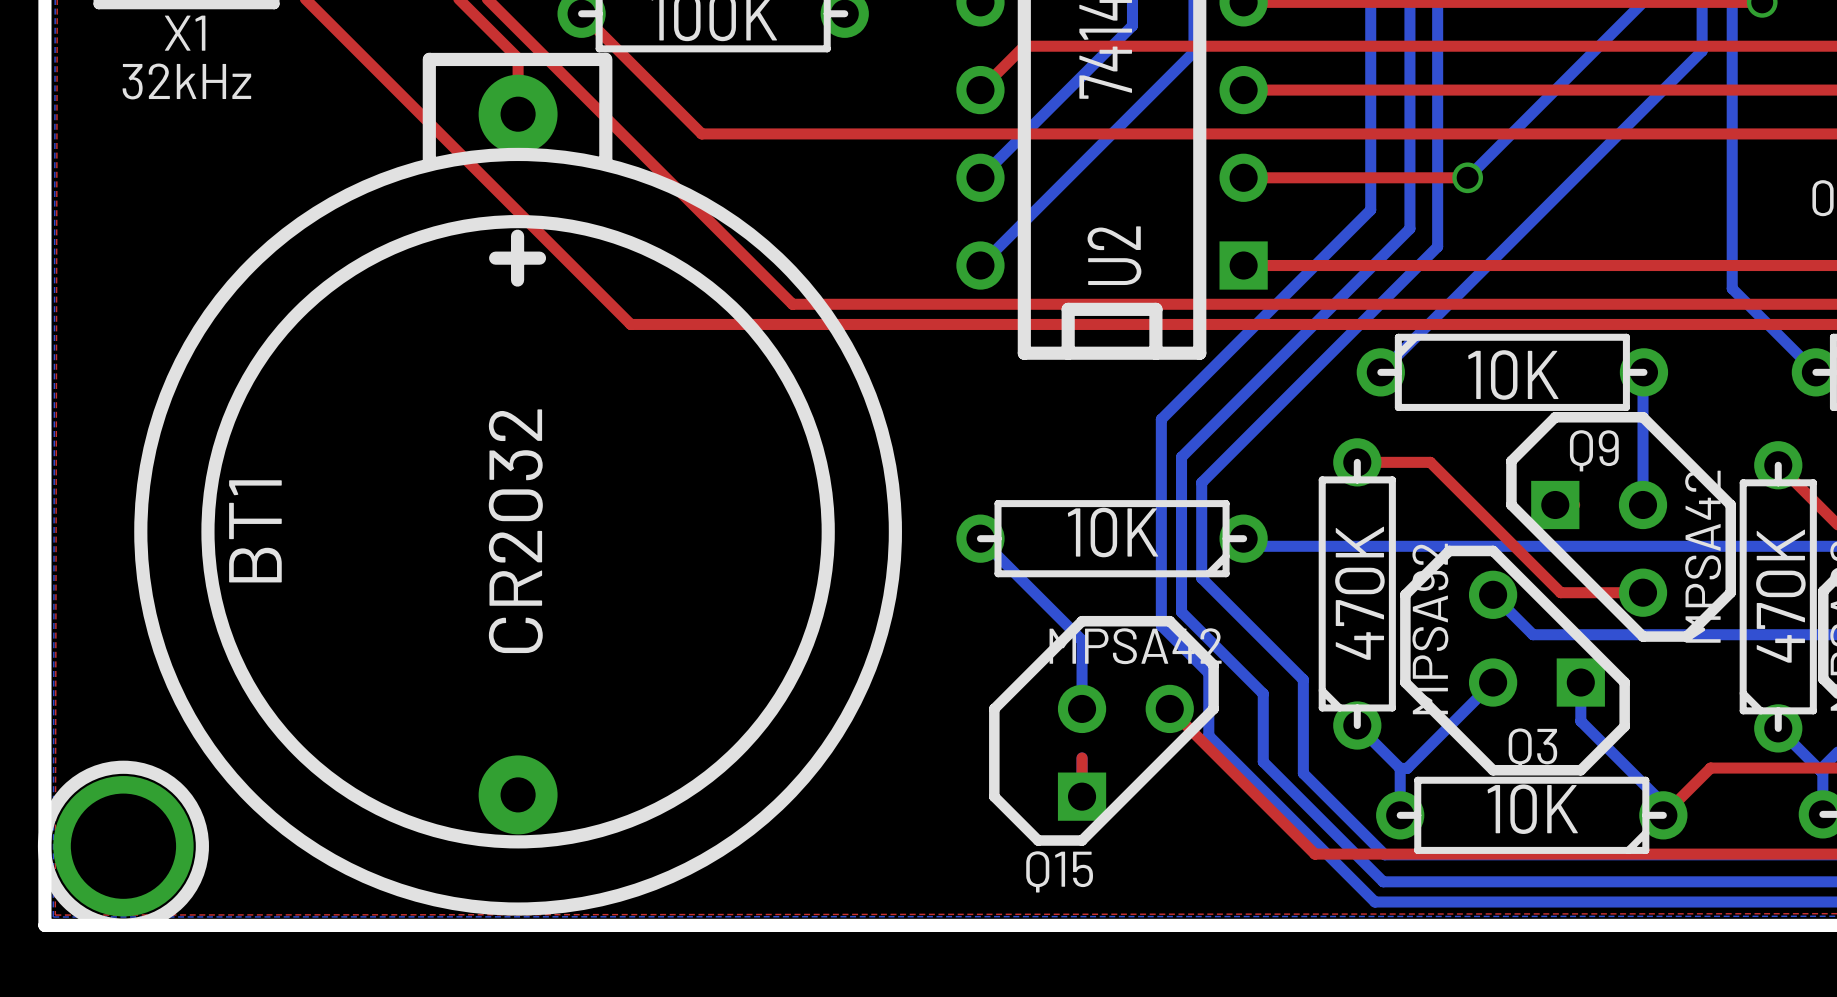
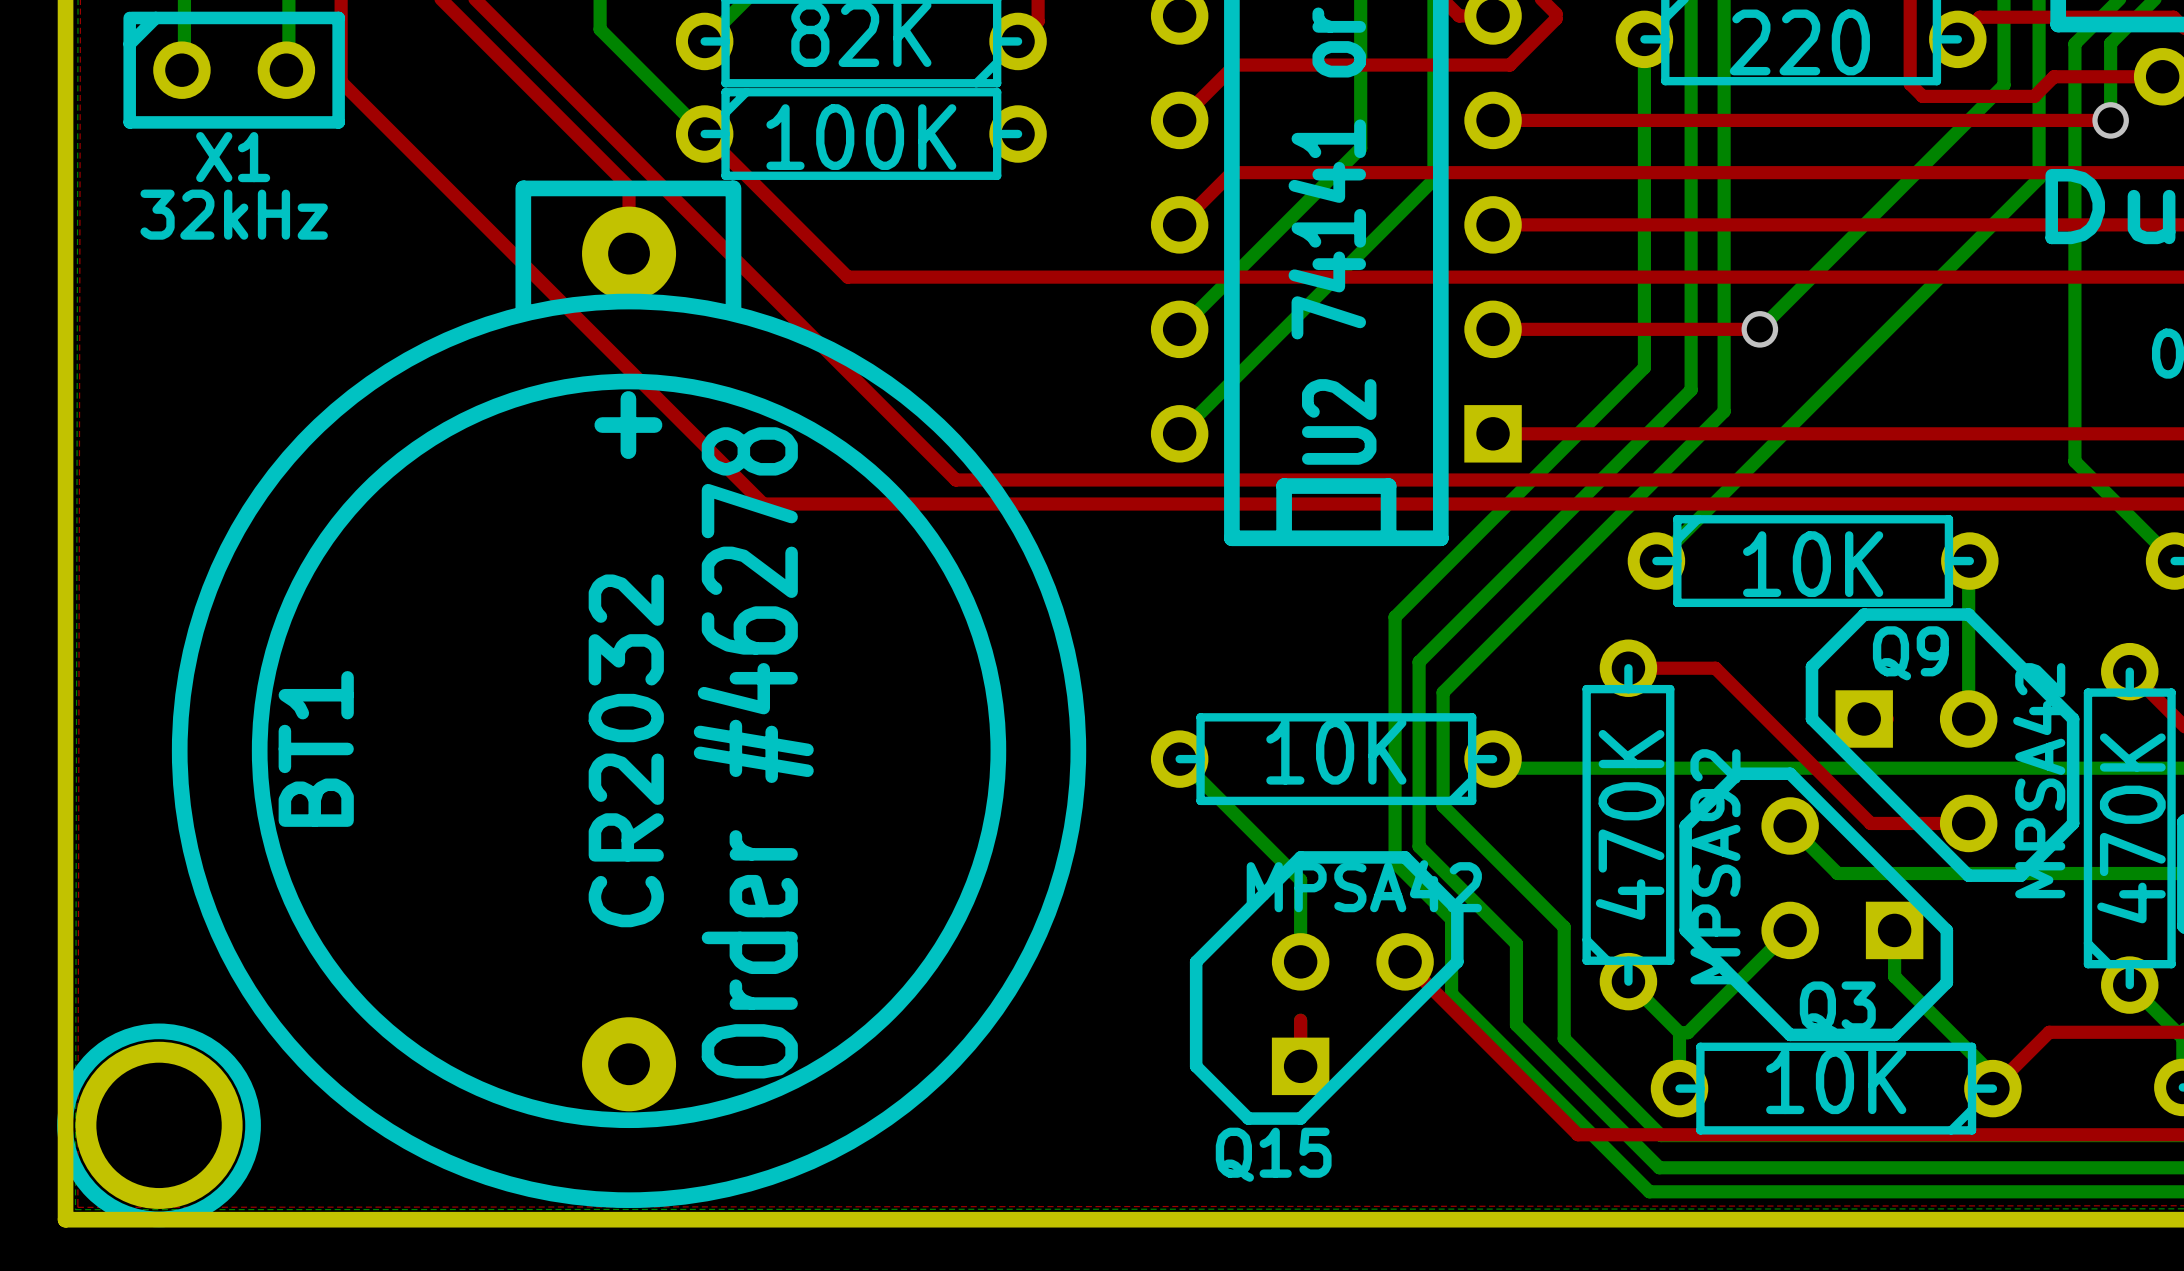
text: none -> Order #46278 (753, 752)

